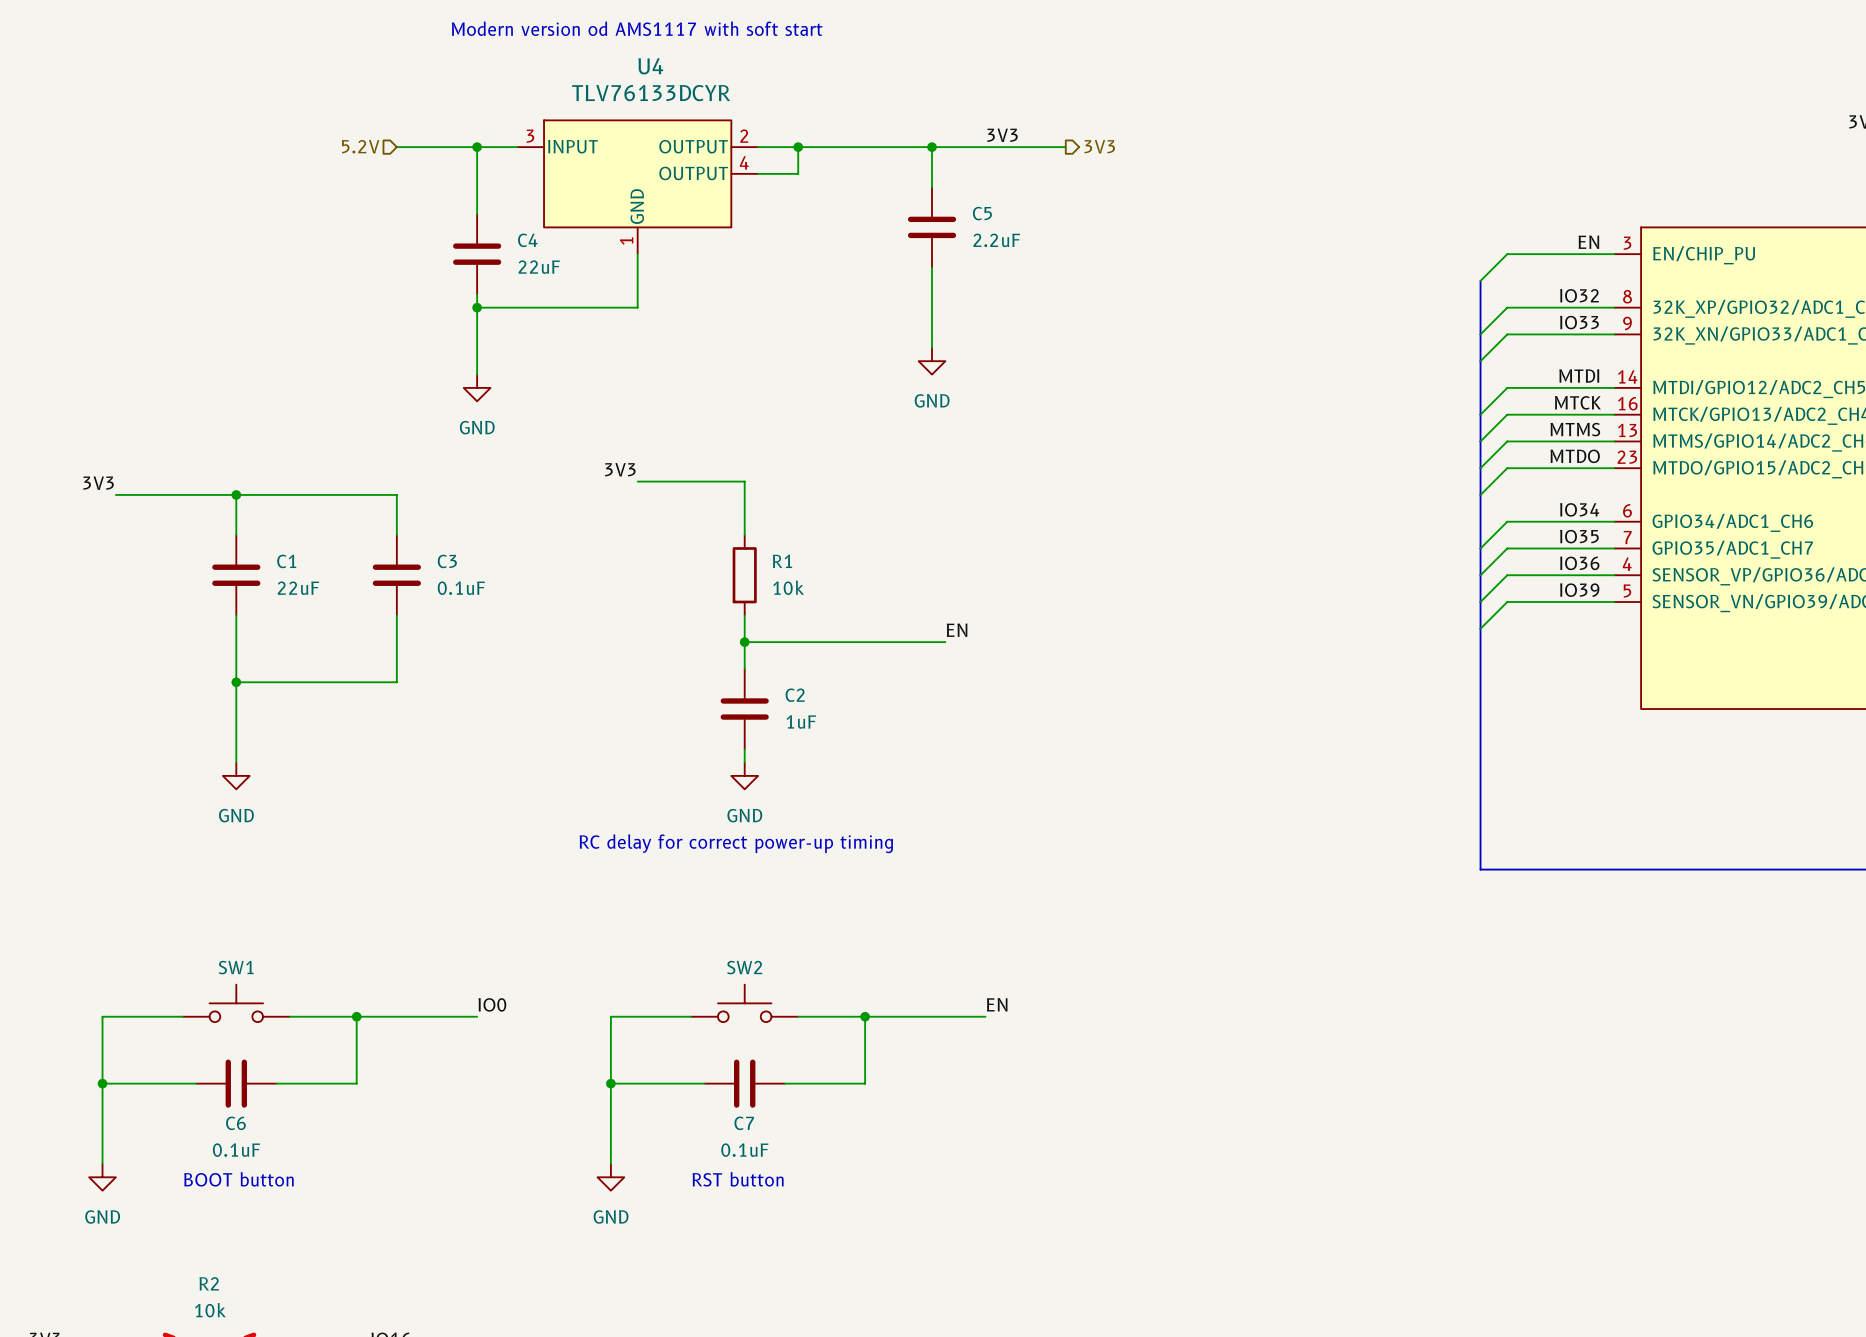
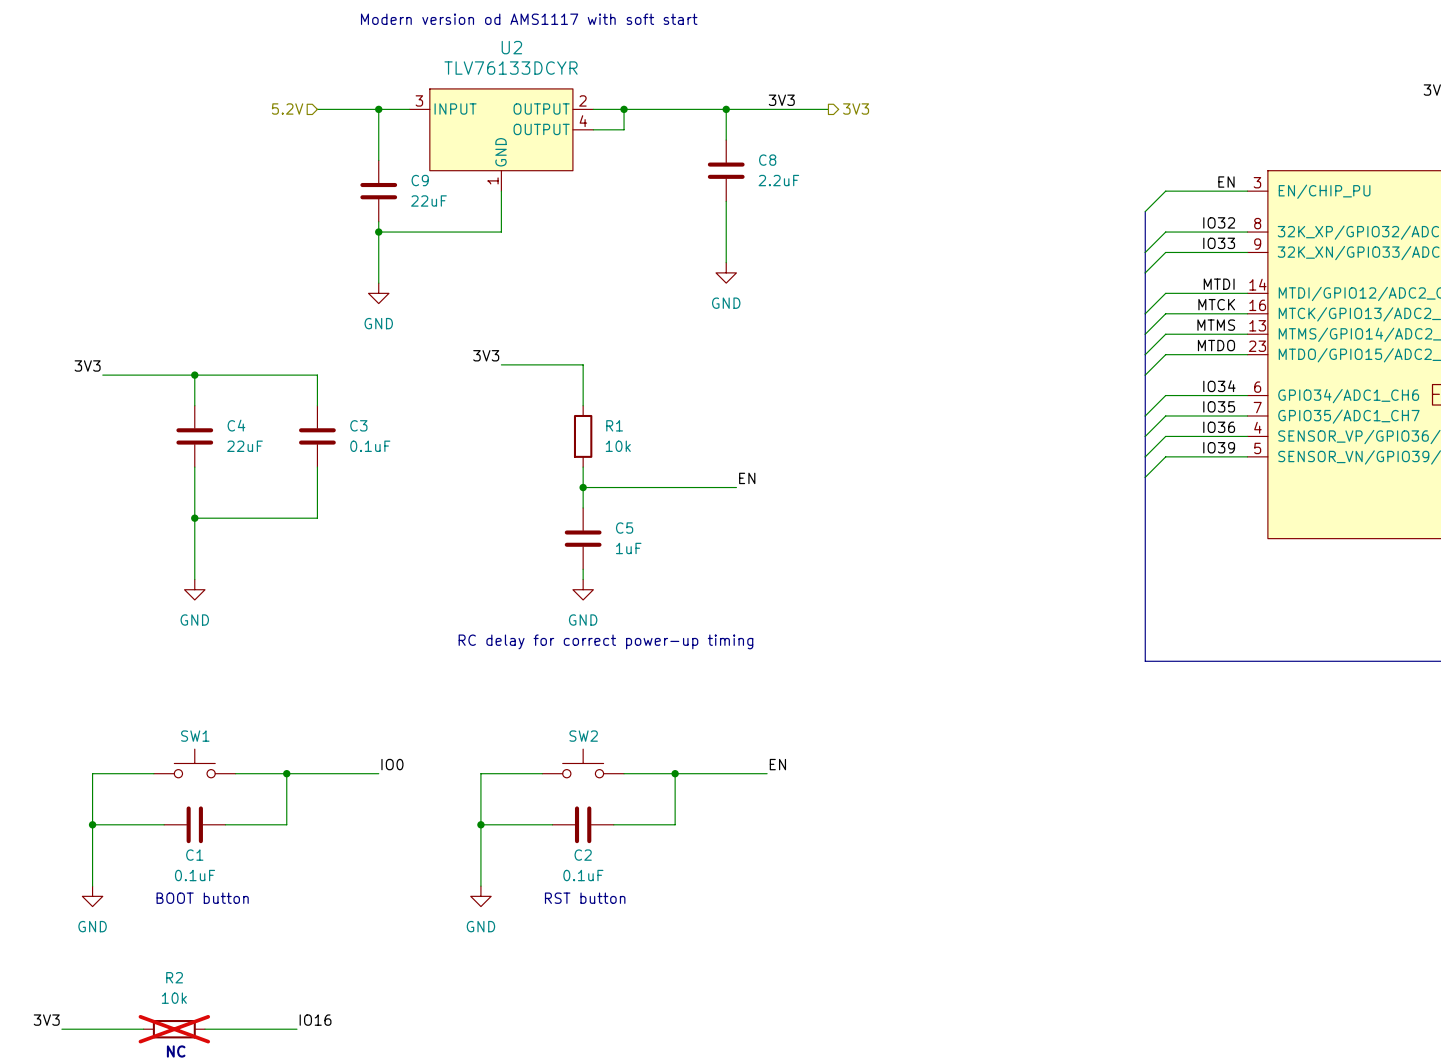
U4 name: U4 (650, 66) -> U2 (511, 47)
C5 name: C5 (982, 213) -> C8 (767, 160)
C4 name: C4 (527, 240) -> C9 (420, 180)
C1 name: C1 (286, 561) -> C4 (236, 425)
C2 name: C2 (795, 695) -> C5 (624, 528)
C6 name: C6 (235, 1123) -> C1 (194, 855)
C7 name: C7 (744, 1123) -> C2 (583, 855)

